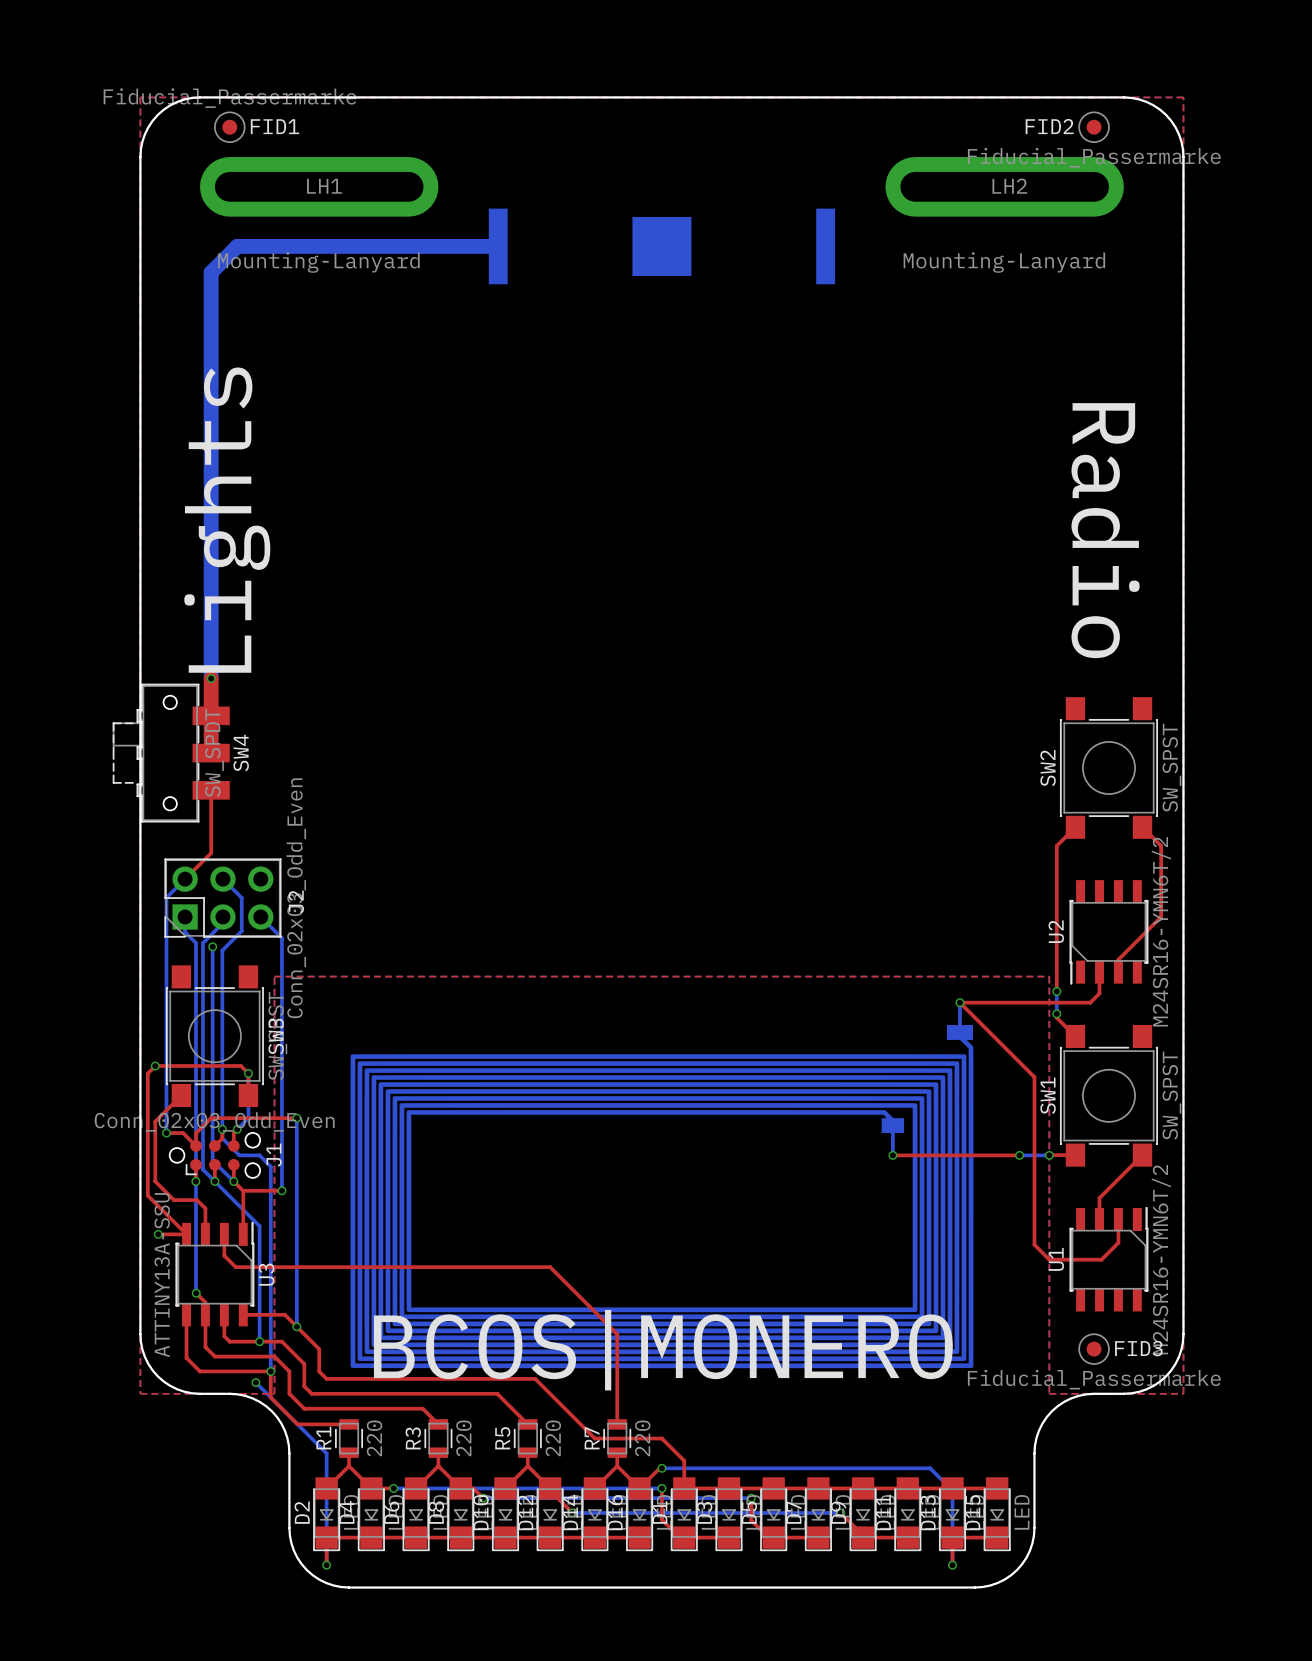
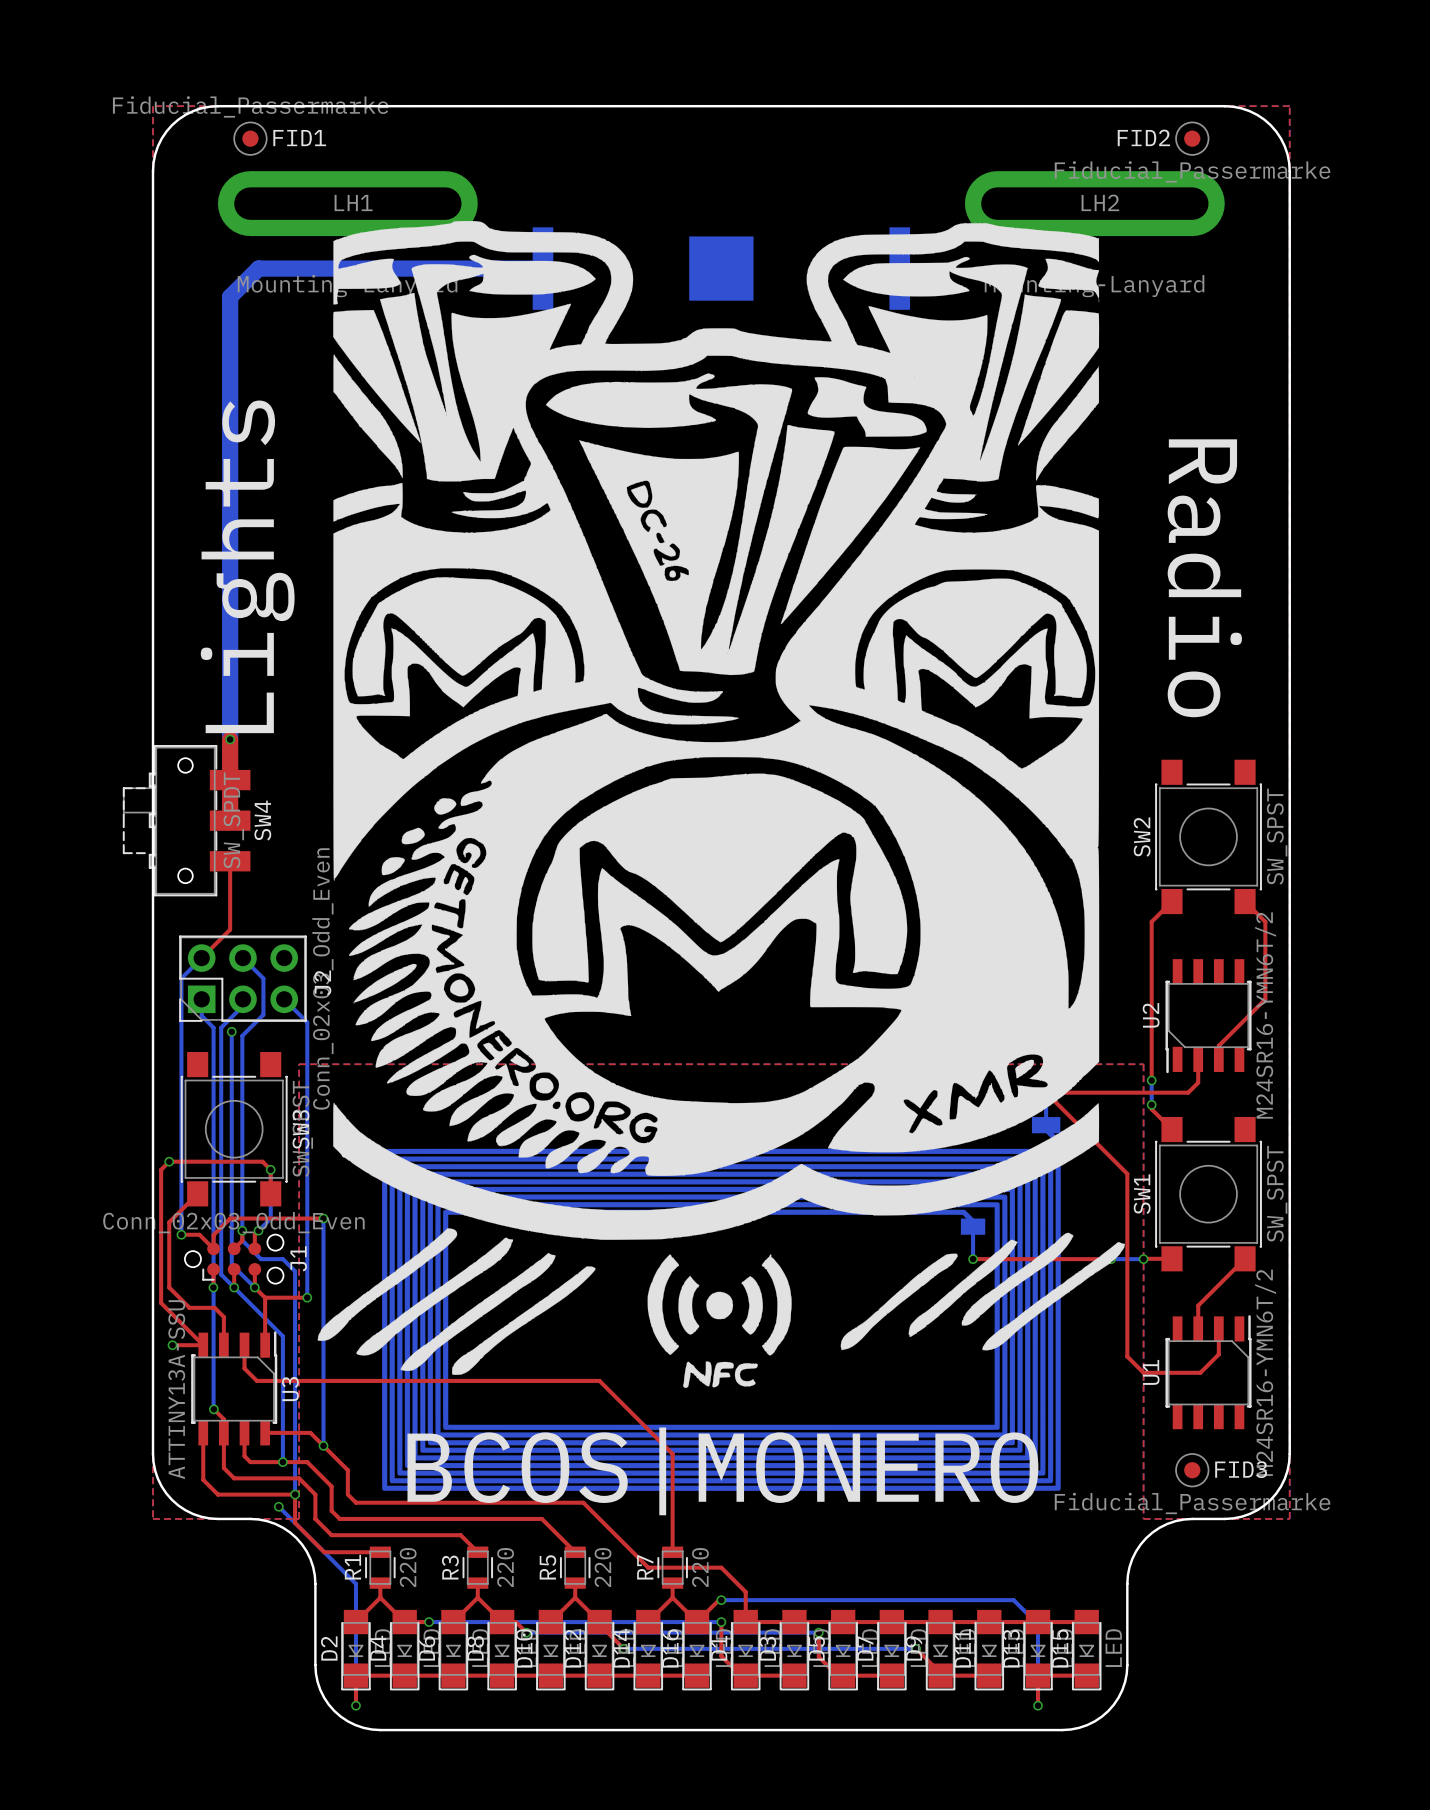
drawing: none -> [317, 220, 1125, 1389]

